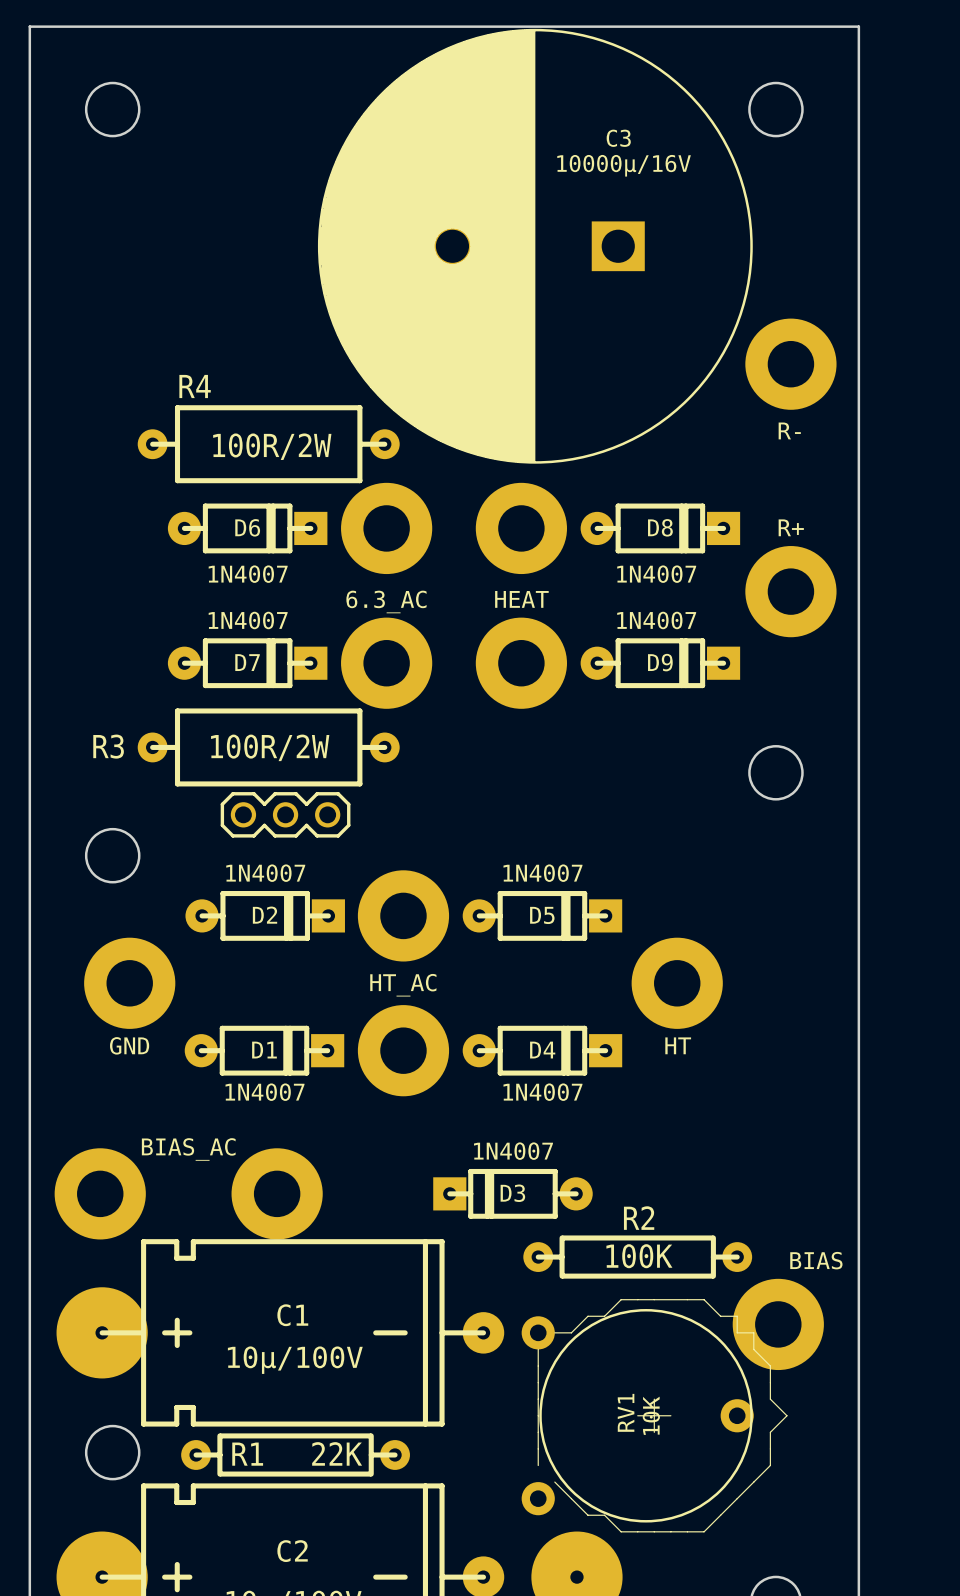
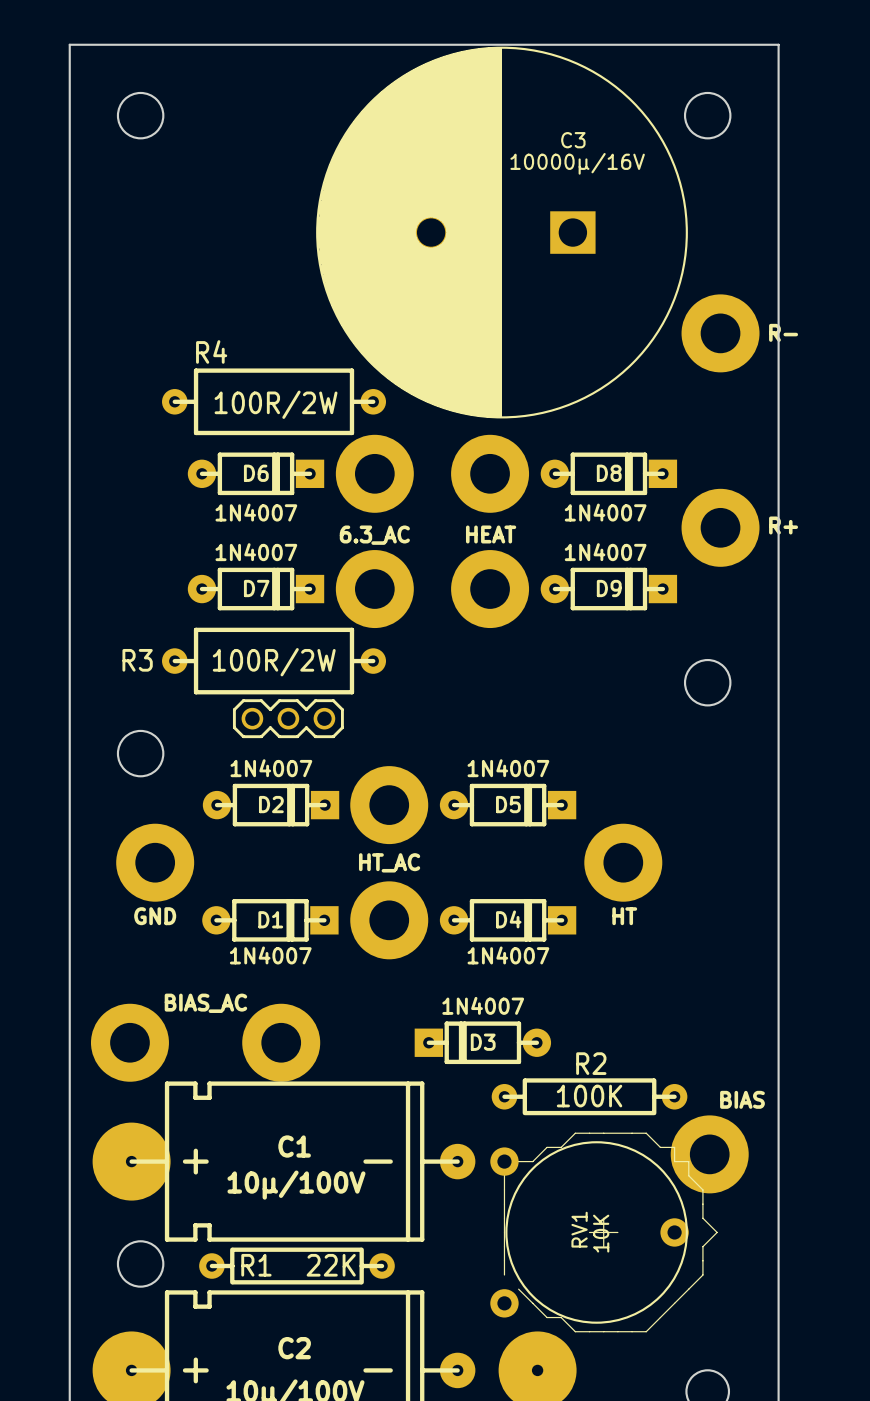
part value position: R- (789, 430) -> R- (783, 332)
part value position: R+ (791, 527) -> R+ (783, 525)

